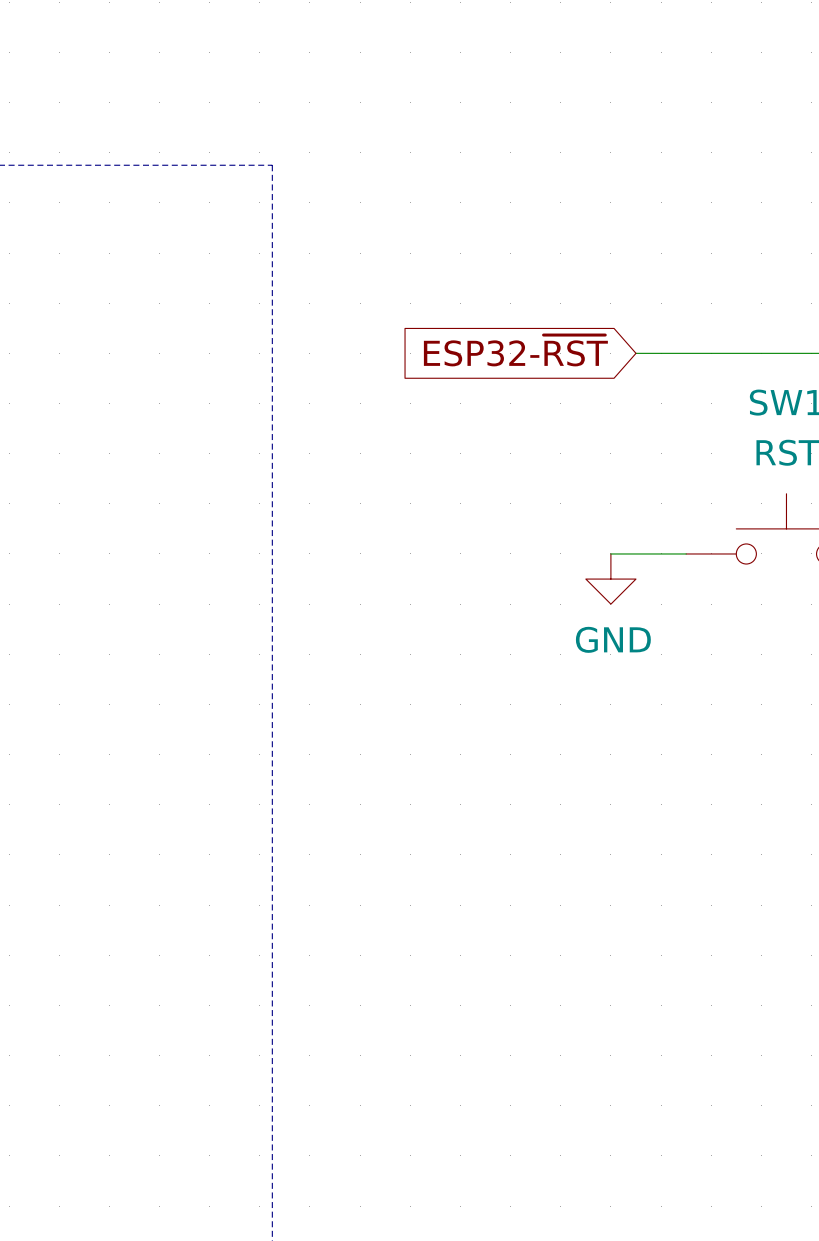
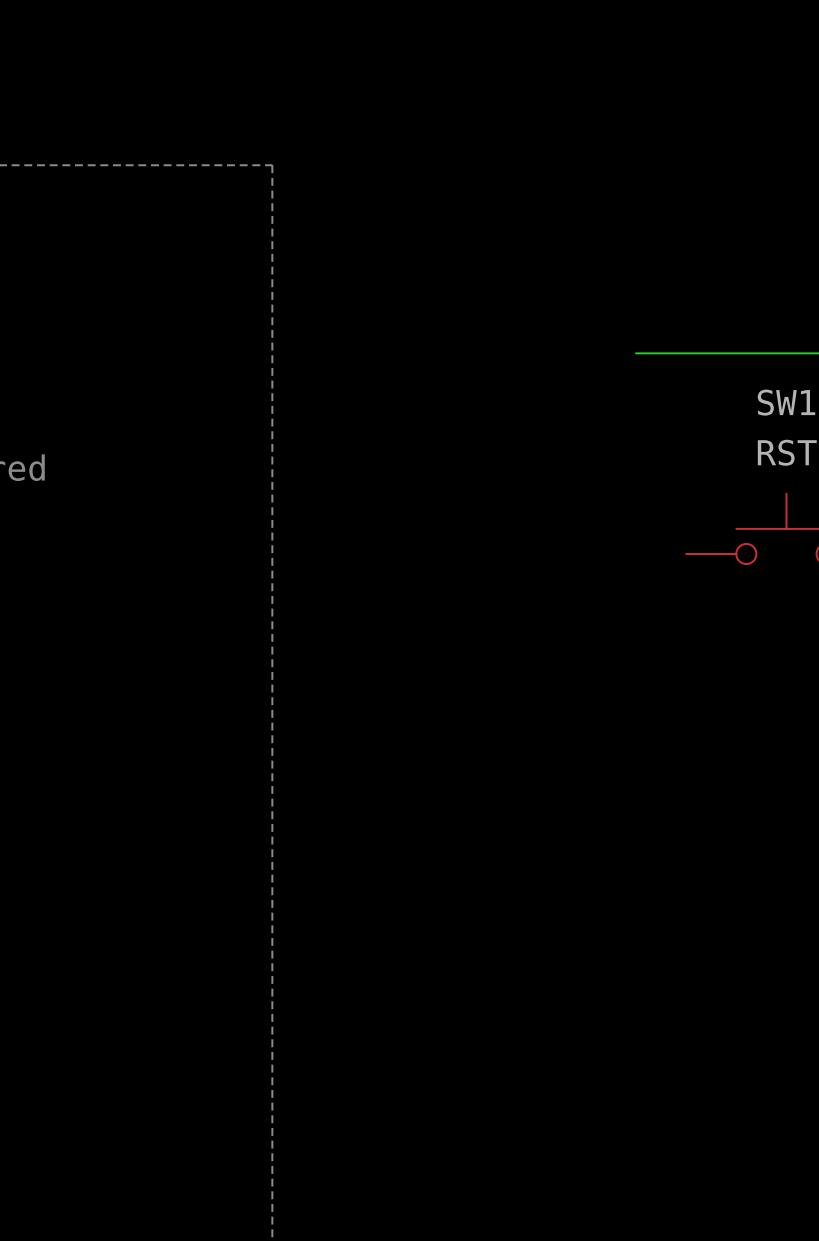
global label: ESP32-~{RST} (515, 350) -> none
wire: (610, 553) (686, 553) -> none
power symbol: GND (610, 579) -> none

